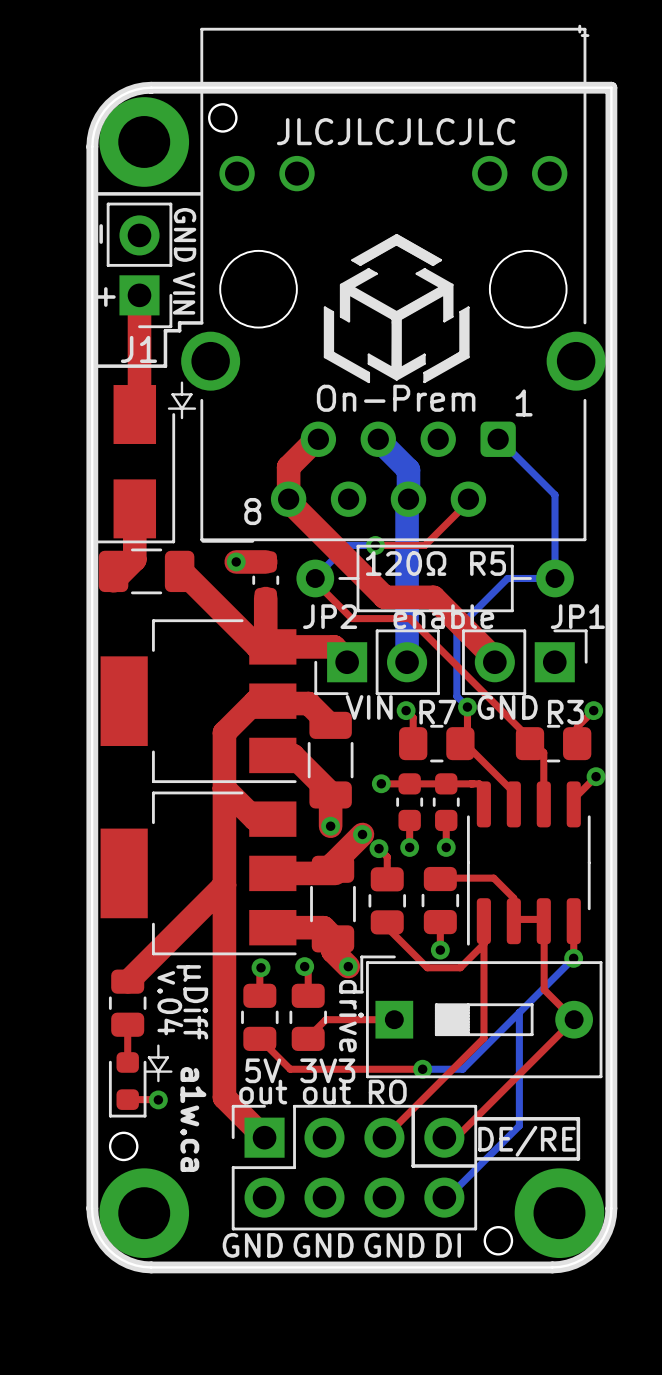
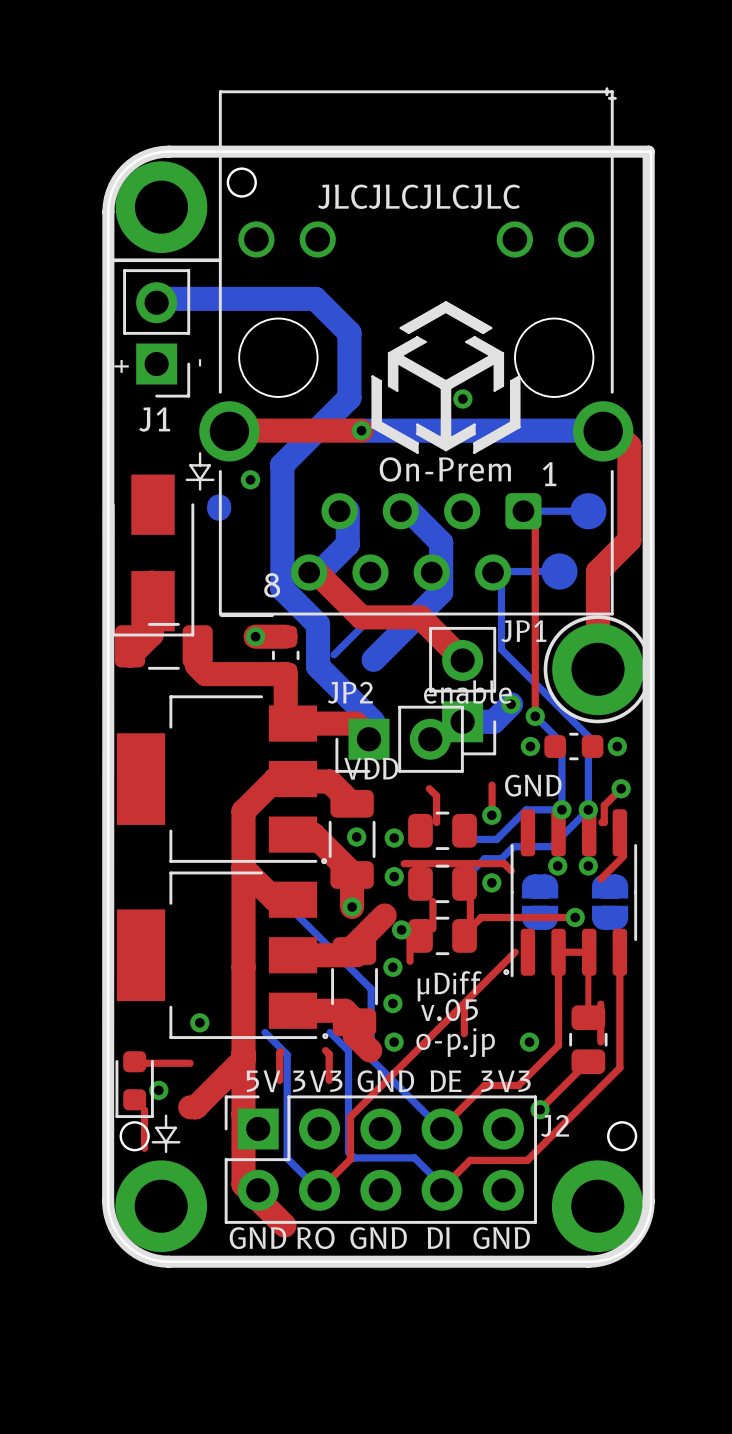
line: (151, 87) (128, 92) (109, 104) (96, 124) (92, 146) (92, 1208) (96, 1231) (104, 1244) (115, 1255) (128, 1262) (143, 1266) (552, 1267) (574, 1262) (594, 1250) (606, 1231) (611, 1208) (611, 87) -> (168, 1261) (595, 1261) (608, 1258) (620, 1252) (631, 1244) (642, 1227) (647, 1214) (648, 1201) (648, 151) (639, 151)
line: none -> (168, 151) (148, 155) (136, 160) (126, 169) (114, 185) (108, 205) (108, 1201) (109, 1214) (114, 1227) (125, 1244) (136, 1252) (148, 1258) (168, 1261)
bottom track: none -> (153, 298) (315, 298) (349, 332) (349, 397) (282, 465)
text position: - (101, 234) -> - (200, 362)
text: GND (185, 234) -> none
text: VIN (184, 293) -> none
top track: (139, 295) (139, 413) -> none
drawing position: (396, 308) -> (445, 377)
line: (201, 322) (179, 322) (179, 330) (165, 330) (165, 366) (92, 366) -> none
via: none -> (462, 399)
top track: none -> (612, 429) (629, 446) (629, 540) (598, 571) (598, 669)
top track: none -> (236, 430) (361, 430)
via: none -> (361, 430)
bottom track: none -> (362, 430) (611, 430)
bottom track: none -> (282, 465) (282, 588) (318, 624) (318, 666) (373, 721)
text position: On-Prem (396, 398) -> On-Prem (445, 469)
via: none -> (250, 479)
bottom track: none -> (219, 506) (219, 508)
top track: (318, 436) (288, 467) (288, 499) -> none
top track: none -> (530, 508) (535, 513) (535, 716)
bottom track: none -> (347, 510) (347, 544) (318, 573)
bottom track: (498, 438) (555, 494) (555, 578) (507, 578) (456, 629) (456, 696) (467, 707) -> none
bottom track: (377, 439) (408, 469) (408, 499) -> none
bottom track: none -> (409, 511) (441, 542) (441, 592) (373, 659)
bottom track: none -> (530, 511) (588, 511)
part: none -> (588, 511)
part position: (134, 464) -> (153, 555)
top track: none -> (315, 571) (361, 617) (420, 617) (462, 659)
bottom track: none -> (559, 571) (501, 571) (501, 649) (588, 736) (588, 809) (551, 846) (513, 846) (501, 858) (484, 858) (458, 885) (458, 891)
part: none -> (559, 571)
bottom track: (407, 499) (407, 658) -> none
top track: (288, 500) (384, 597) (433, 597) (494, 658) -> none
top track: (467, 502) (425, 545) (375, 545) -> none
drawing: none -> [543, 615, 652, 724]
via: (375, 545) -> none
text: 120Ω (406, 563) -> none
top track: (179, 569) (257, 646) (272, 646) -> none
R5: (435, 578) -> none
top track: (314, 580) (351, 618) (409, 618) (543, 752) (543, 804) -> none
top track: none -> (196, 665) (205, 674) (285, 674)
part: none -> (598, 669)
bottom track: none -> (511, 704) (493, 721) (462, 721)
via: none -> (511, 704)
bottom track: none -> (535, 716) (561, 743) (561, 809) (526, 809) (496, 839) (470, 839) (458, 827)
via: none -> (535, 716)
JP1 rotation: 0° (524, 662) -> 90° clockwise (462, 691)
JP1 position: (524, 662) -> (462, 691)
via: none -> (530, 746)
via: none -> (617, 746)
text: none -> VDD (371, 768)
text: VIN (369, 707) -> none
via: (467, 707) -> none
via: (406, 710) -> none
via: none -> (561, 809)
via: none -> (588, 809)
via: none -> (491, 815)
top track: (460, 738) (513, 792) (513, 806) -> none
R7: (436, 743) -> none
R3: (553, 743) -> none
part: none -> (442, 830)
via: none -> (356, 837)
via: none -> (394, 838)
part footprint: [396, 773, 424, 832] -> [408, 864, 477, 904]
via: (596, 776) -> none
drawing: none -> [321, 858, 328, 865]
via position: (381, 783) -> (394, 876)
via: none -> (557, 865)
via: none -> (588, 865)
part rotation: 0° (446, 802) -> 90° clockwise (573, 746)
part position: (446, 802) -> (573, 746)
via: none -> (491, 882)
part: none -> (540, 902)
part: none -> (610, 902)
bottom track: none -> (296, 914) (371, 989) (371, 1059) (441, 1129)
via: (362, 834) -> none
top track: none -> (575, 917) (481, 917) (462, 935)
via: none -> (575, 917)
via: (409, 847) -> none
via: (446, 847) -> none
part: none -> (442, 935)
part position: (528, 863) -> (573, 893)
top track: none -> (515, 952) (350, 1116) (350, 1159) (319, 1190)
top track: none -> (590, 952) (558, 952) (558, 1045) (518, 1085) (484, 1085) (441, 1129)
top track: none -> (619, 952) (619, 1067) (527, 1160) (470, 1160) (441, 1189)
top track: none -> (588, 955) (588, 1017)
top track: (440, 878) (493, 878) (513, 898) (513, 921) -> none
top track: (224, 885) (128, 981) -> none
via: none -> (392, 967)
drawing: none -> [503, 969, 510, 976]
part: (387, 900) -> none
part: (440, 900) -> none
top track: (515, 919) (544, 919) (544, 989) (574, 1019) (456, 1137) (442, 1137) -> none
via: none -> (392, 1003)
top track: (483, 921) (483, 944) (460, 967) (427, 967) (384, 925) -> none
text: none -> v.05 (449, 1010)
via: none -> (199, 1022)
top track: (483, 941) (483, 1038) (384, 1137) -> none
bottom track: none -> (264, 1032) (287, 1054) (287, 1158) (320, 1191)
bottom track: none -> (330, 1032) (348, 1050) (348, 1152) (354, 1157) (414, 1157) (445, 1189)
drawing: none -> [322, 1033, 329, 1040]
via: (440, 950) -> none
part: none -> (588, 1039)
text: none -> o-p.jp (455, 1042)
via: none -> (529, 1042)
bottom track: (573, 958) (462, 1069) (422, 1069) -> none
via: (573, 958) -> none
via: (304, 966) -> none
via position: (348, 966) -> (394, 1042)
via: (261, 967) -> none
part footprint: [108, 969, 147, 1037] -> [115, 1051, 154, 1119]
top track: none -> (243, 1059) (195, 1107) (190, 1107)
top track: none -> (588, 1061) (540, 1109)
top track: none -> (136, 1063) (190, 1063)
text: none -> DE (446, 1081)
text: none -> 3V3 (506, 1081)
text rotation: 0° (192, 1002) -> 90° counterclockwise (449, 986)
text position: μDiff (192, 1002) -> μDiff (449, 986)
text: v.04 (170, 1003) -> none
via: none -> (158, 1090)
bottom track: (519, 1012) (519, 1125) (443, 1201) -> none
text: drive (351, 1016) -> GND (385, 1081)
part: (481, 1016) -> none
part: (259, 1017) -> none
part: (308, 1017) -> none
top track: (394, 1019) (325, 1019) (308, 1037) -> none
via: none -> (540, 1109)
round board edge: none -> [607, 1121, 638, 1152]
top track: (259, 1038) (290, 1069) (422, 1069) -> none
drawing position: (158, 1063) -> (166, 1133)
via: (422, 1069) -> none
text position: 5V (263, 1070) -> 5V (263, 1081)
text position: 3V3 (327, 1070) -> 3V3 (317, 1081)
J2: none -> (380, 1159)
part: (127, 1084) -> none
text: out (263, 1092) -> none
text: out (326, 1092) -> none
text position: RO (387, 1092) -> RO (315, 1238)
via: (158, 1099) -> none
line: (413, 1107) (413, 1165) (474, 1165) -> none
line: (476, 1118) (578, 1118) (578, 1158) (476, 1158) -> none
text: a1w.ca (193, 1119) -> none
text: DE/RE (526, 1141) -> none
round board edge position: (123, 1146) -> (134, 1136)
text: none -> GND (257, 1238)
text: none -> GND (378, 1238)
text: none -> GND (501, 1238)
part: (354, 1167) -> none
part position: (144, 1213) -> (161, 1206)
part position: (559, 1213) -> (597, 1206)
round board edge: [483, 1226, 514, 1256] -> none
text: GND (252, 1245) -> none
text: GND (323, 1245) -> none
text: GND (394, 1245) -> none
text position: DI (448, 1245) -> DI (438, 1237)

